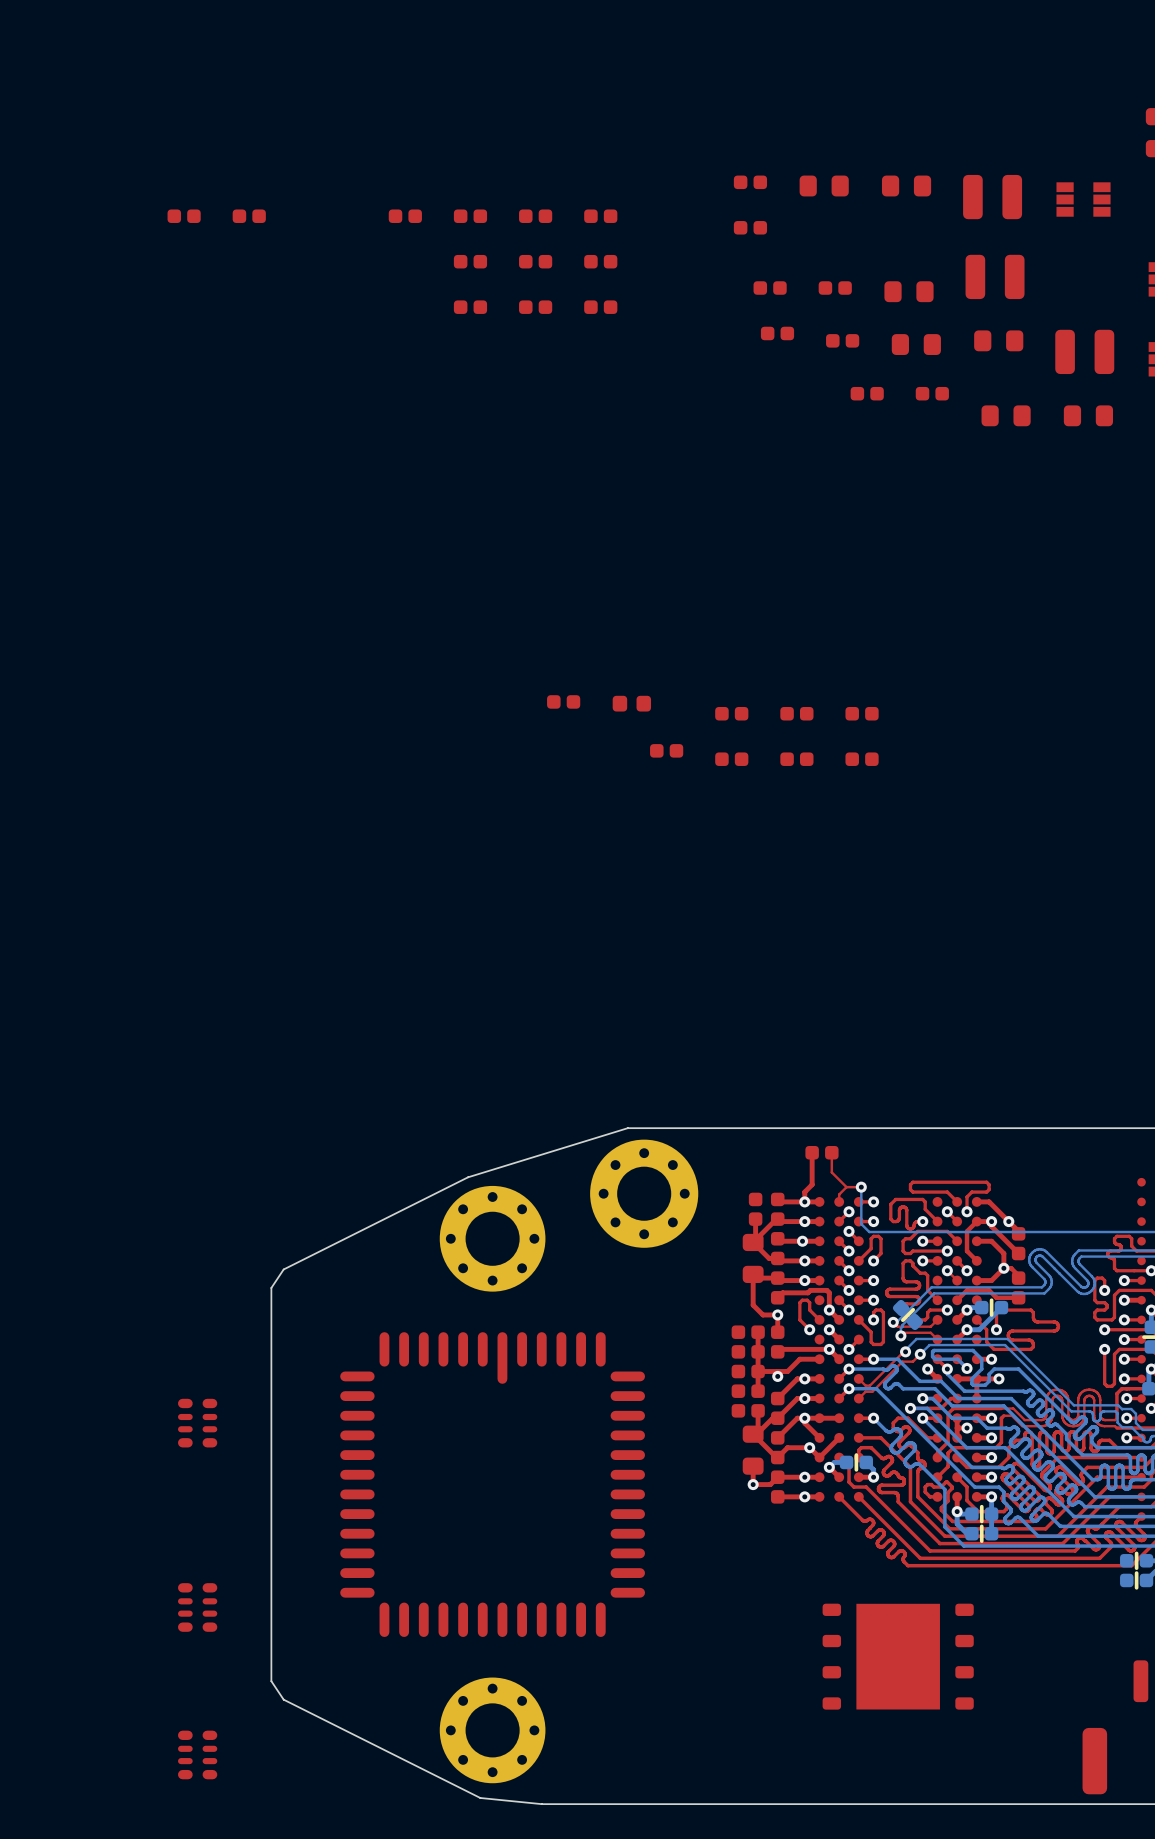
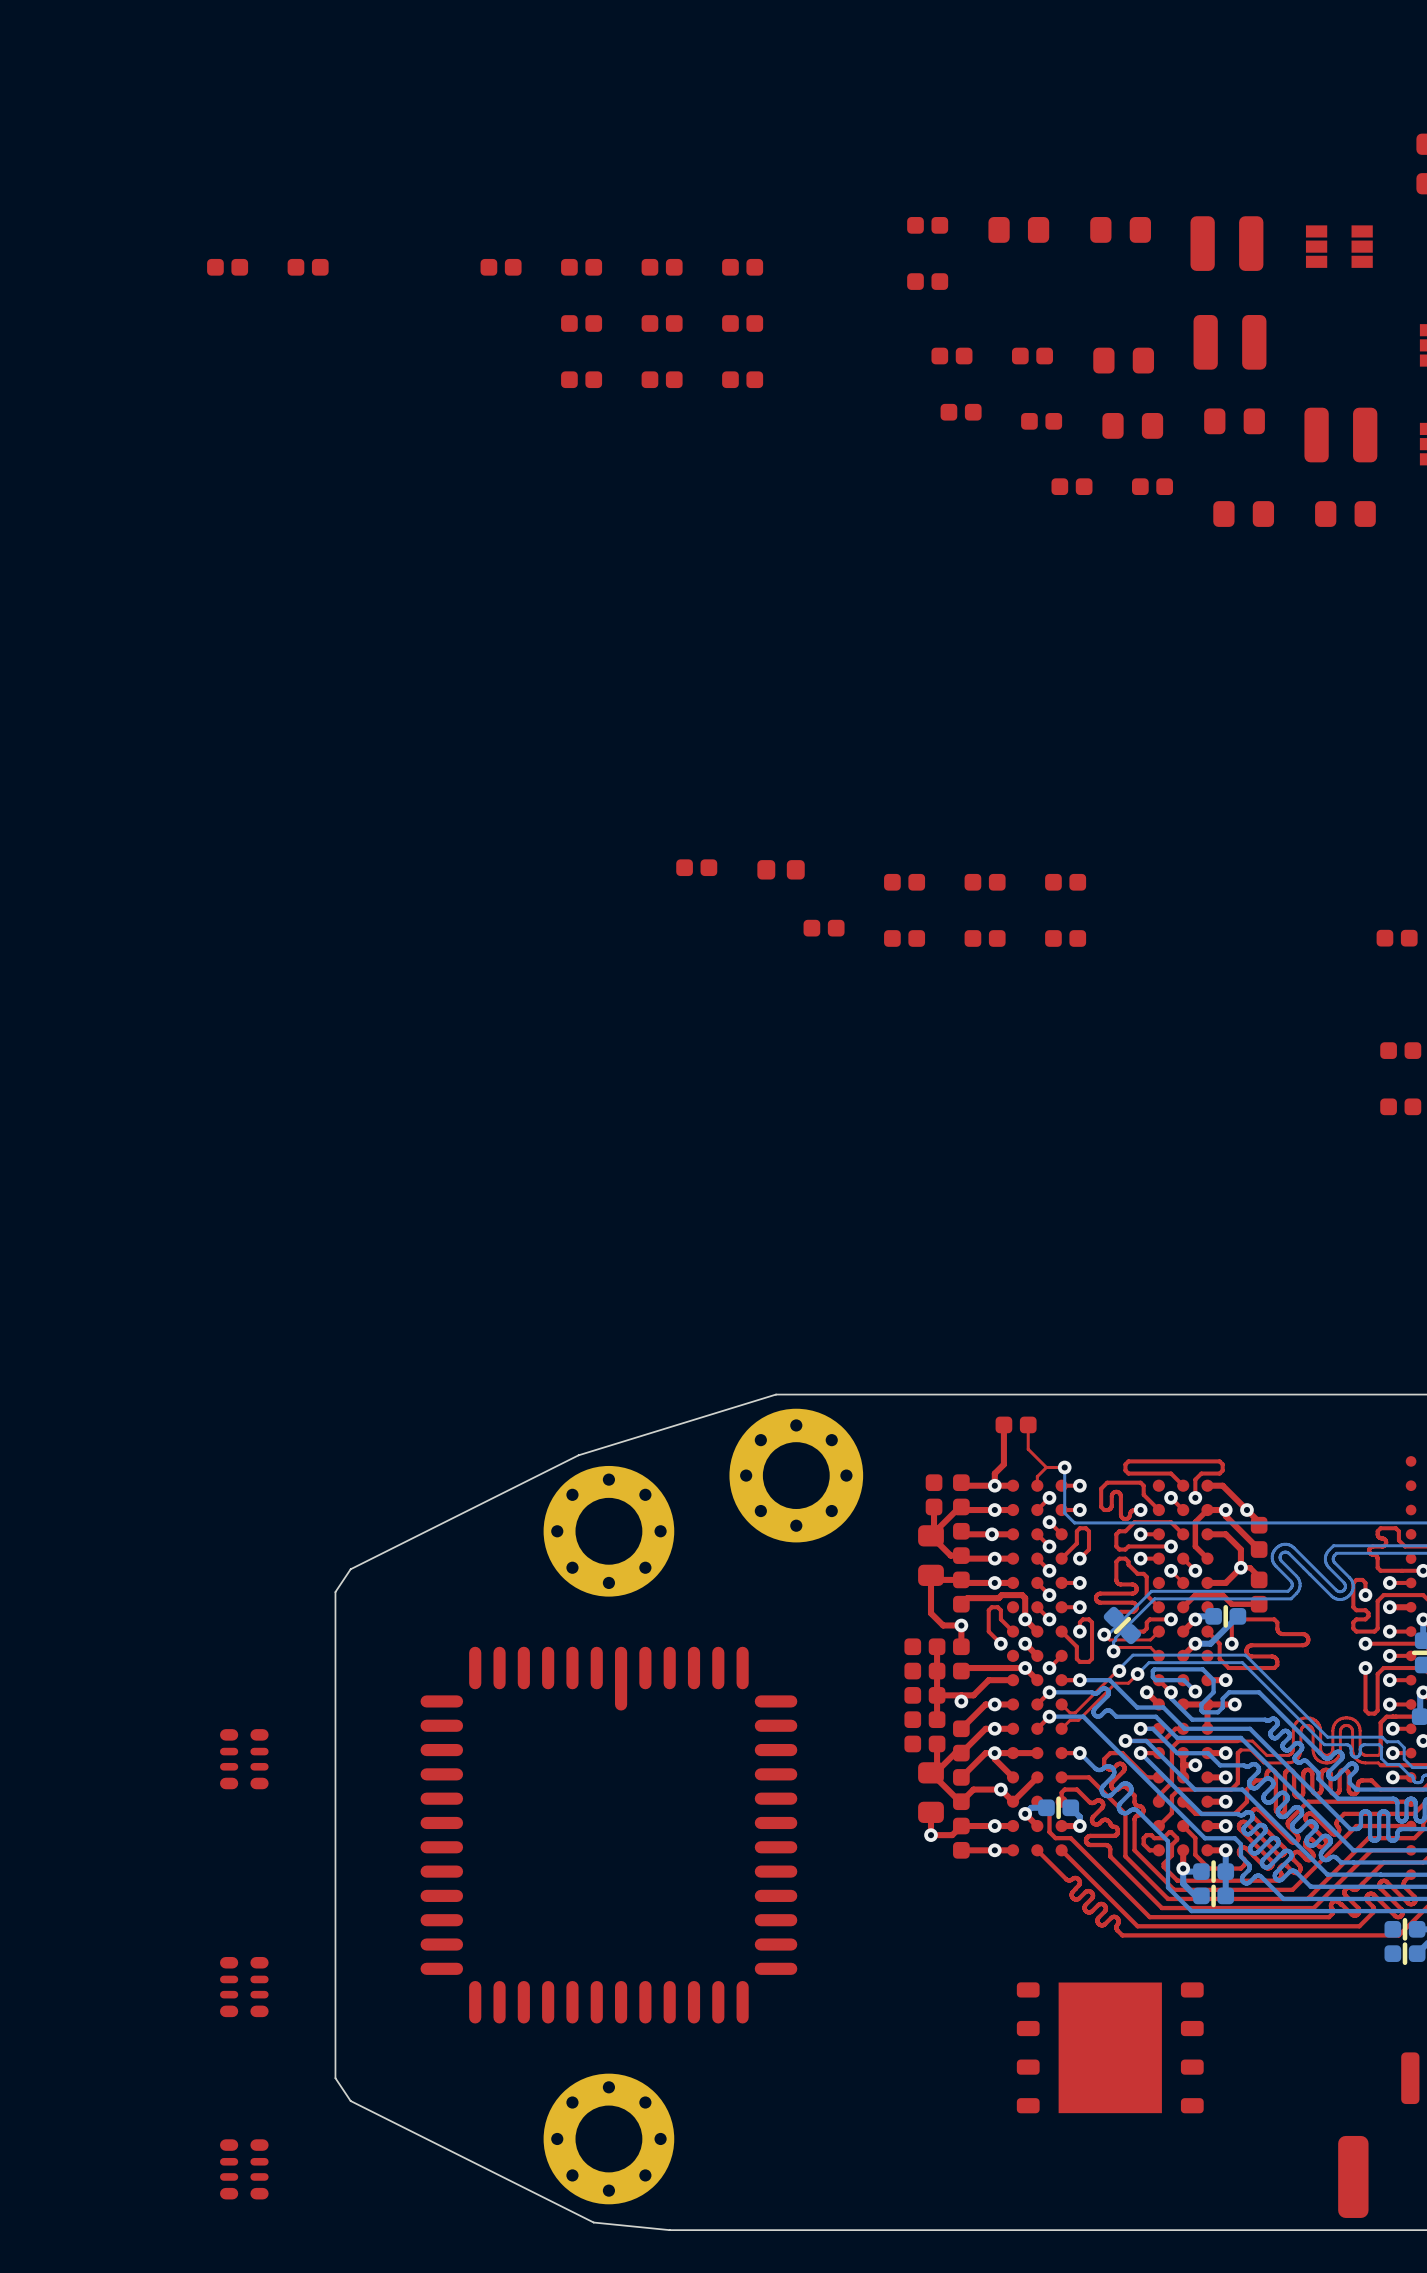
part: none -> (1397, 938)
part: none -> (1400, 1050)
part: none -> (1400, 1106)

